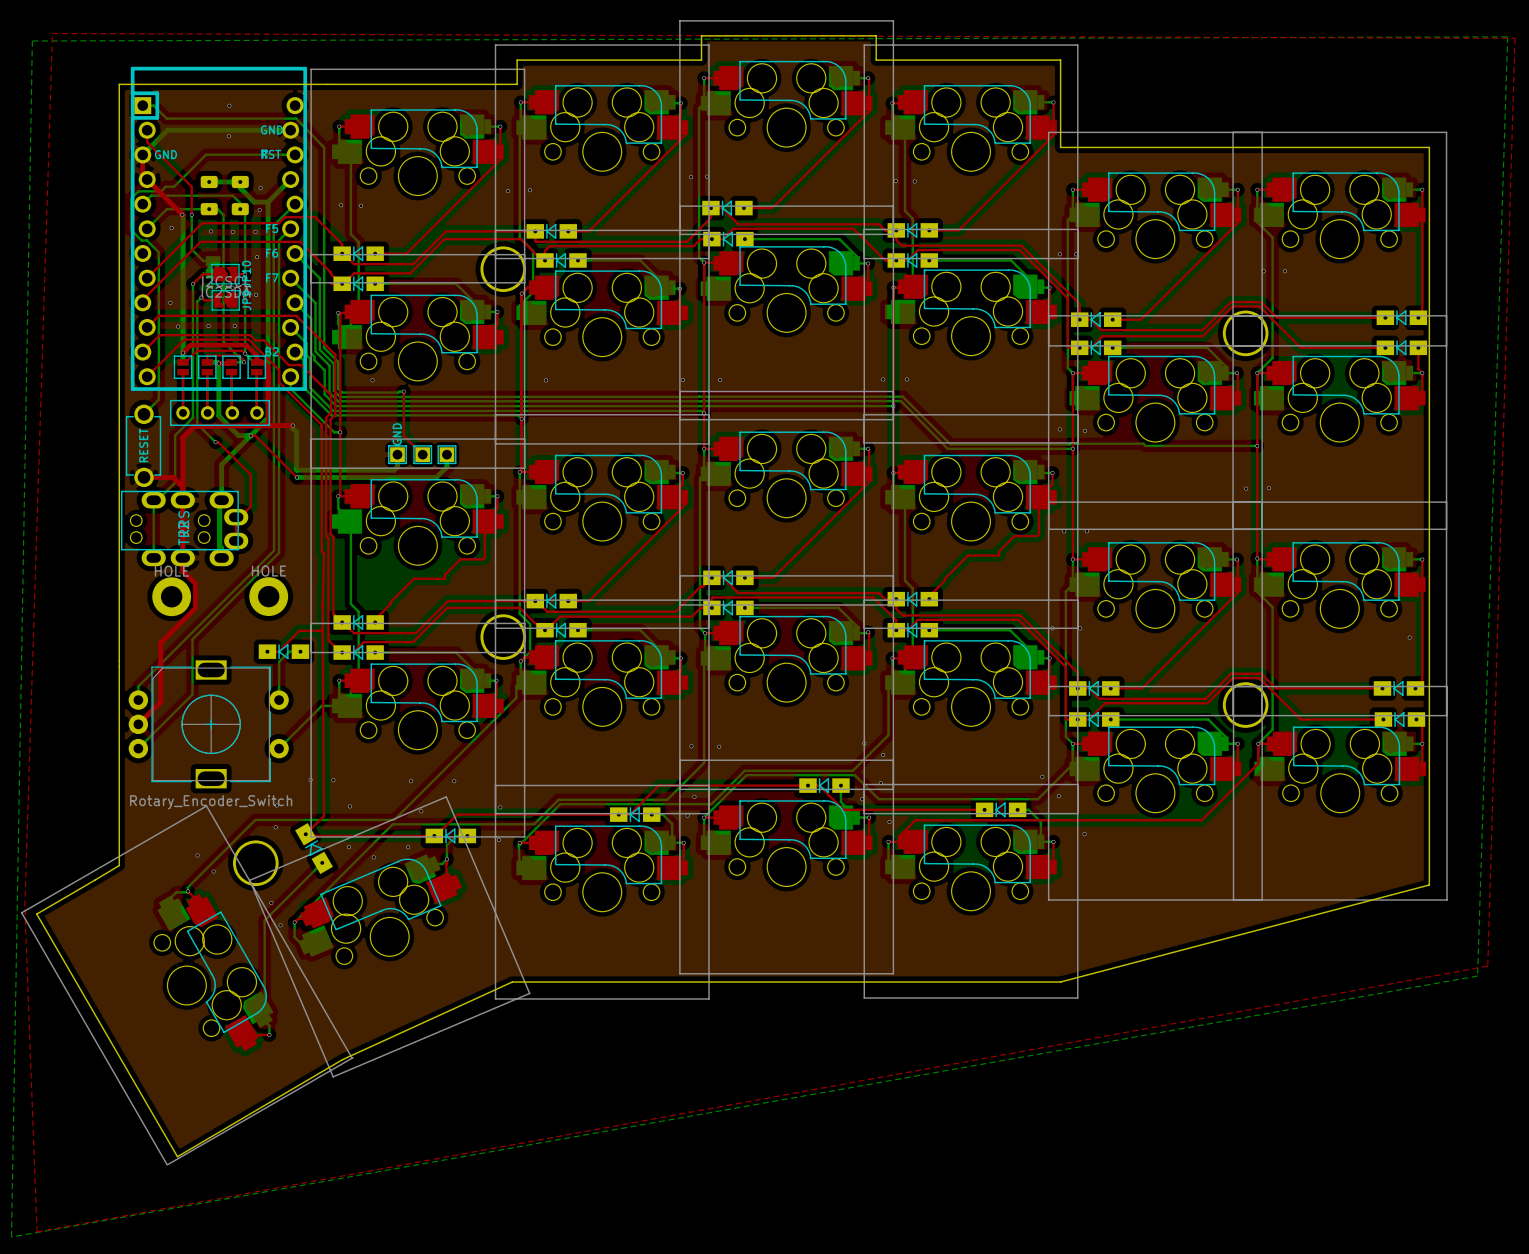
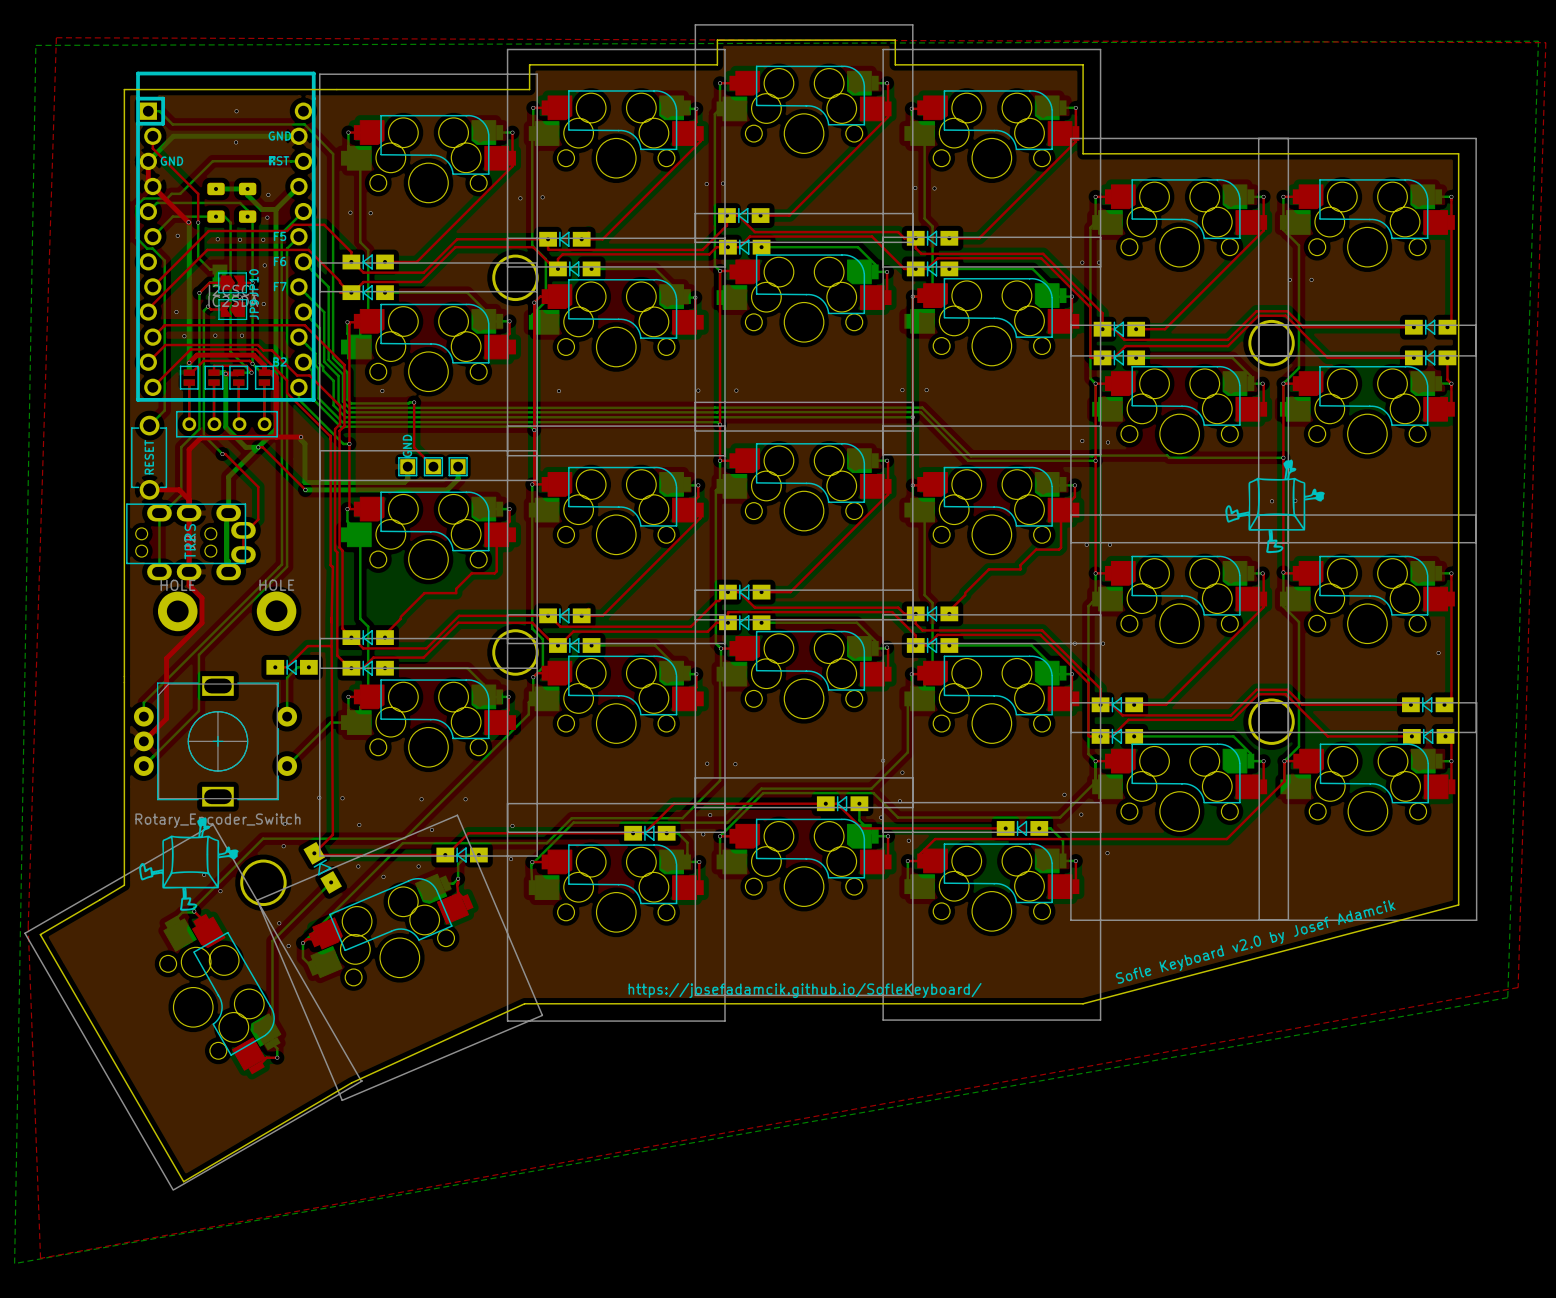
drawing: none -> [1225, 459, 1325, 554]
drawing: none -> [139, 817, 239, 911]
text: none -> Sofle Keyboard v2.0 by Josef Adamcik (1255, 941)
text: none -> https://josefadamcik.github.io/SofleKeyboard/ (805, 990)

